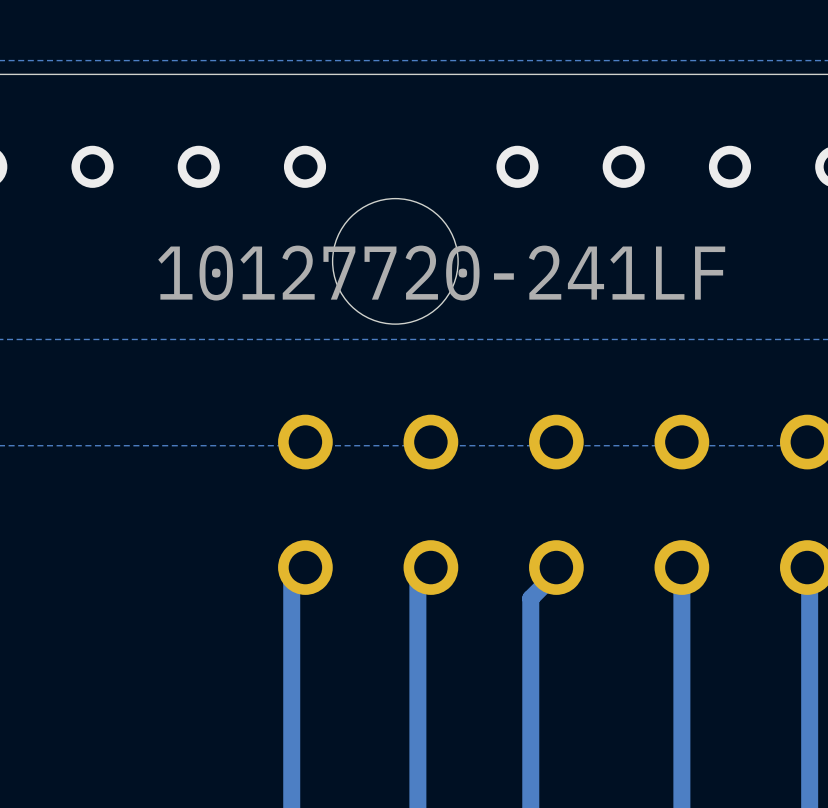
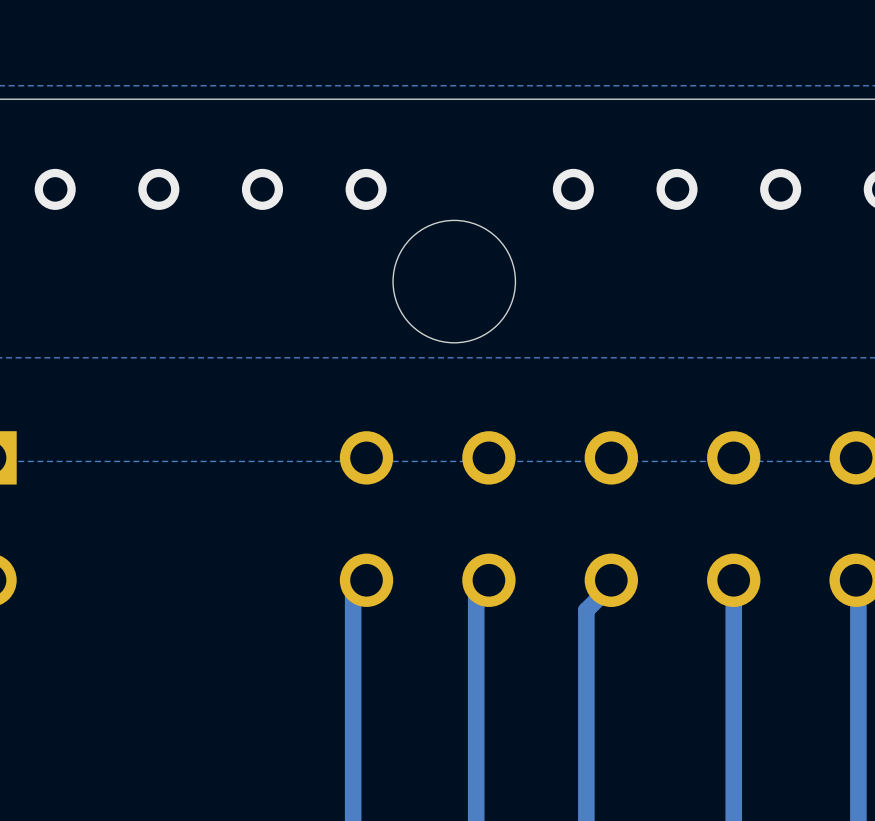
part value: 10127720-241LF (441, 273) -> none

